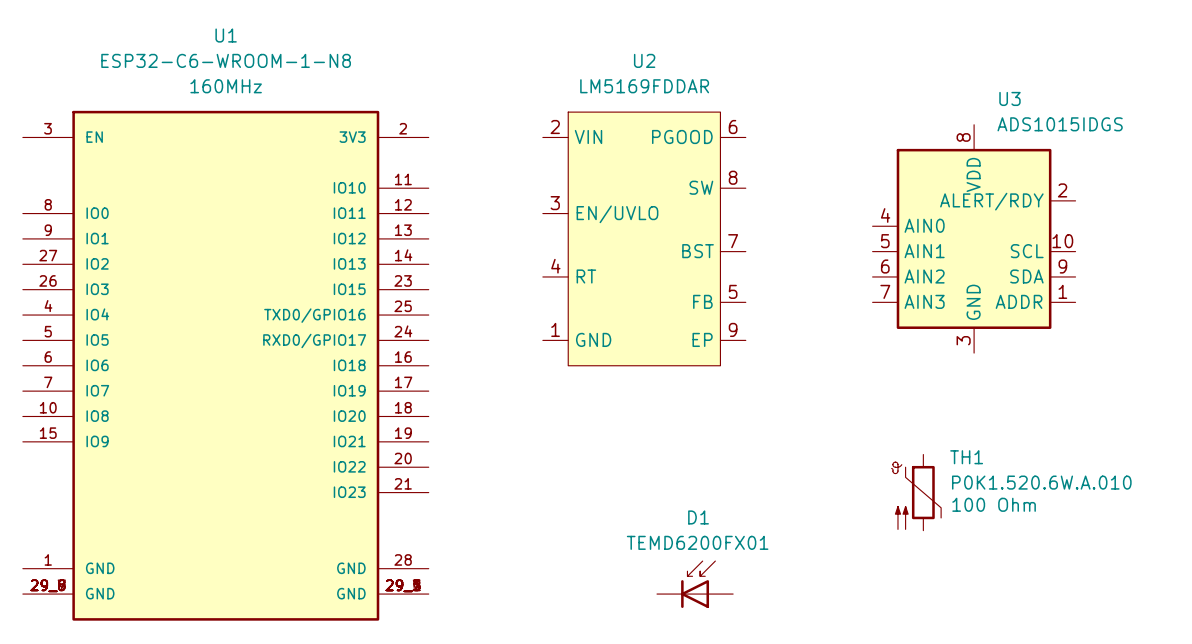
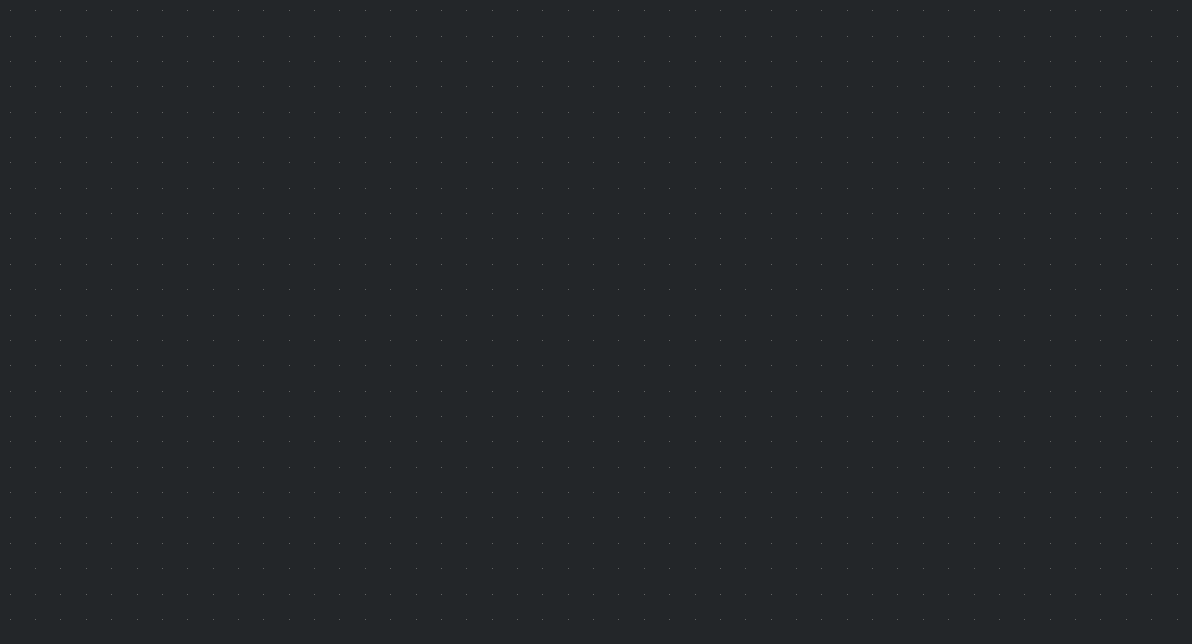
U2: LM5169FDDAR (644, 238) -> none
U3: ADS1015IDGS (974, 238) -> none
U1: ESP32-C6-WROOM-1-N8 (225, 365) -> none
TH1: P0K1.520.6W.A.010 (916, 492) -> none
D1: TEMD6200FX01 (695, 584) -> none

